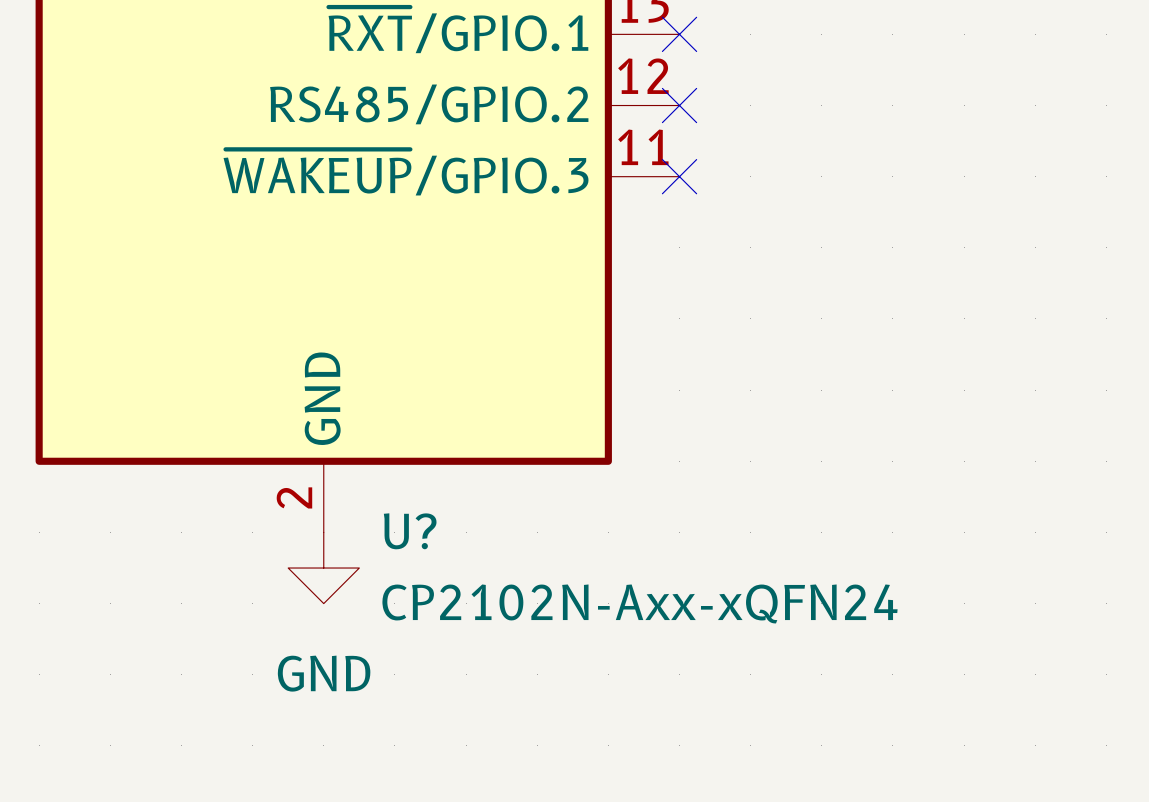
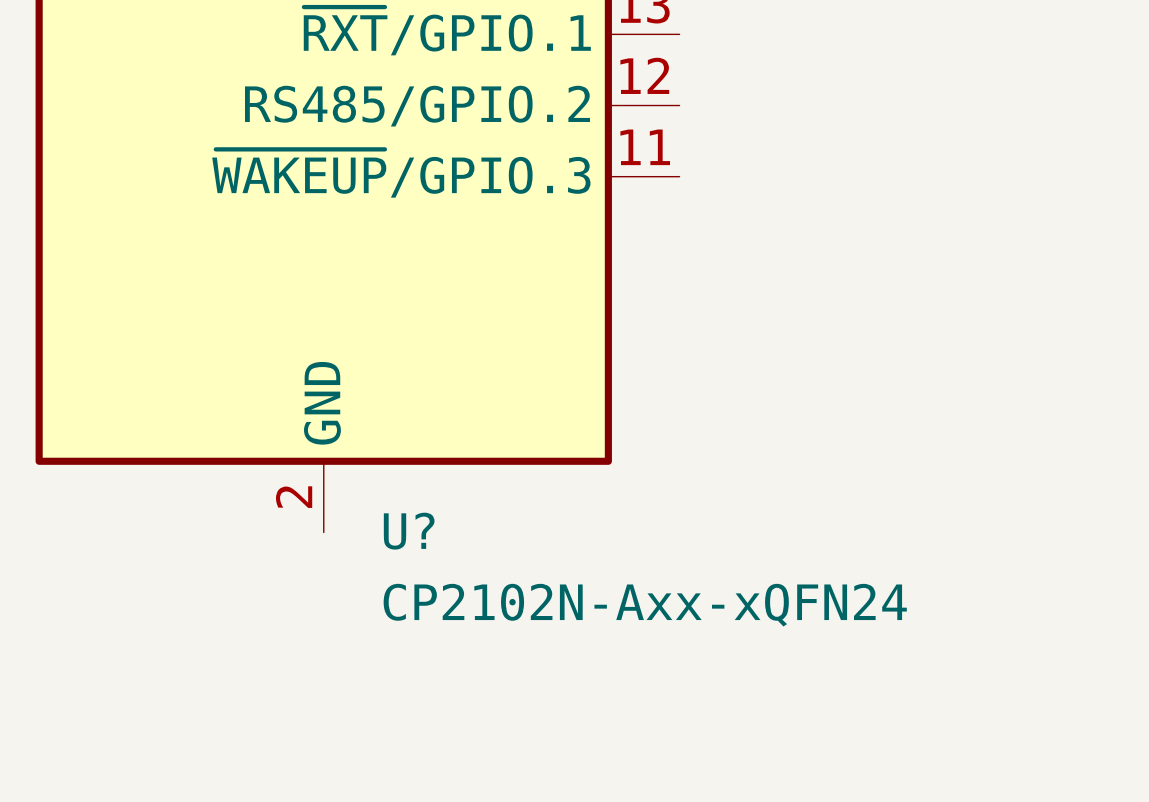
no-connect mark: (679, 34) -> none
no-connect mark: (679, 105) -> none
no-connect mark: (679, 176) -> none
power symbol: GND (323, 568) -> none

